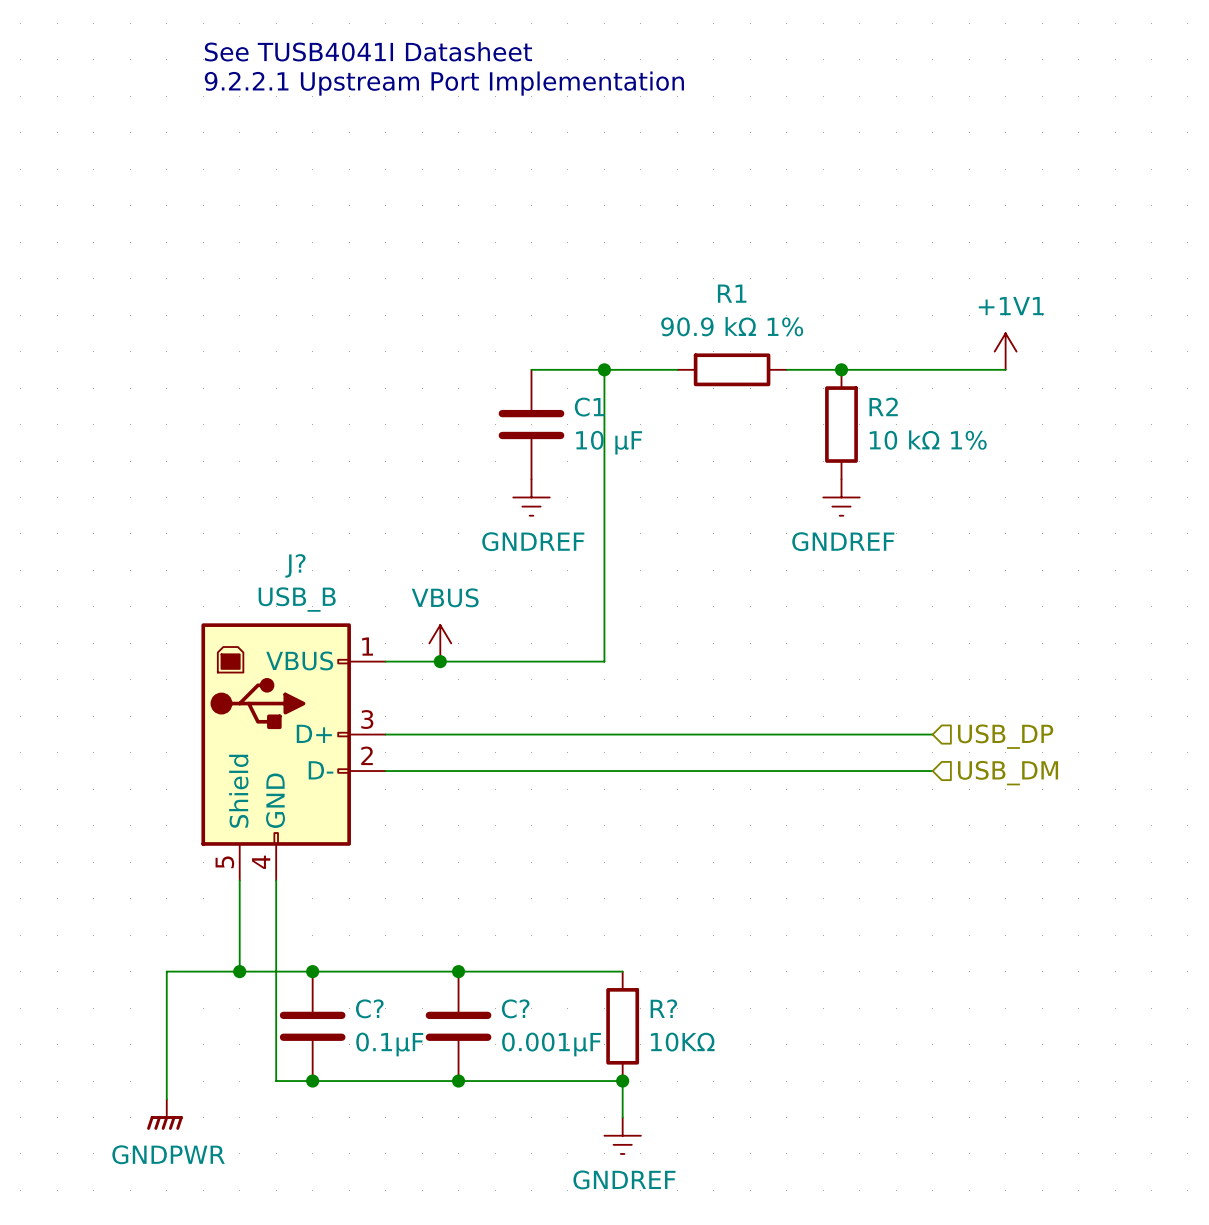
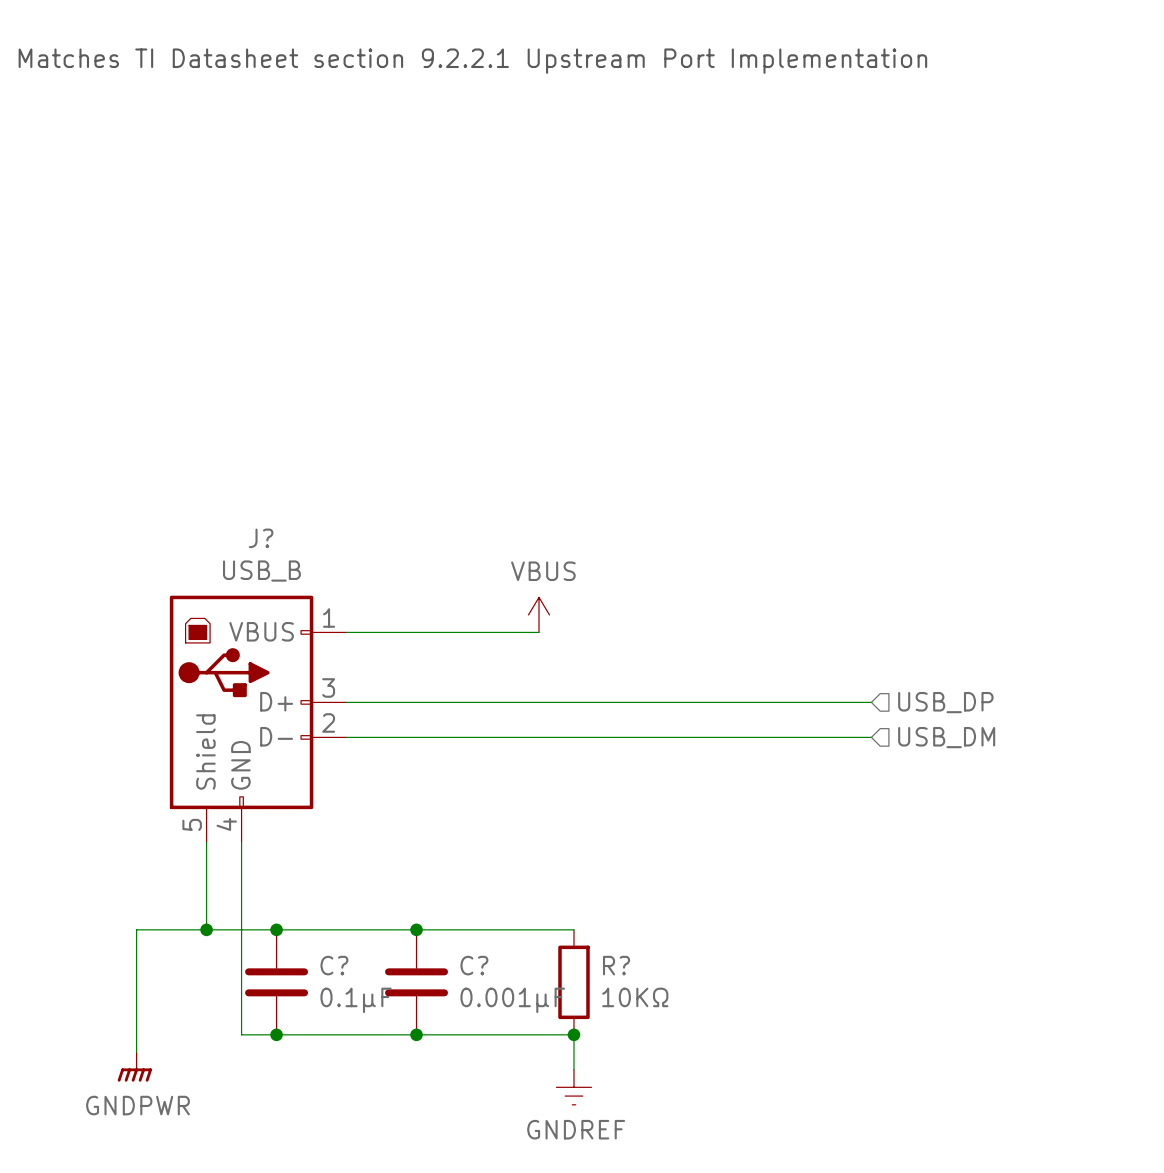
text: See TUSB4041I Datasheet (368, 51) -> none
text: 9.2.2.1 Upstream Port Implementation (444, 83) -> Matches TI Datasheet section 9.2.2.1 Upstream Port Implementation (472, 61)
power symbol: +1V1 (1005, 351) -> none
wire: (531, 369) (677, 369) -> none
wire: (604, 369) (604, 661) (586, 661) -> none
junction: (604, 369) -> none
R1: 90.9 kΩ 1% (732, 369) -> none
wire: (786, 369) (1005, 369) -> none
junction: (841, 369) -> none
C1: 10 μF (531, 424) -> none
R2: 10 kΩ 1% (841, 424) -> none
power symbol: GNDREF (531, 497) -> none
power symbol: GNDREF (841, 497) -> none
power symbol position: VBUS (440, 643) -> VBUS (539, 614)
junction: (440, 661) -> none

